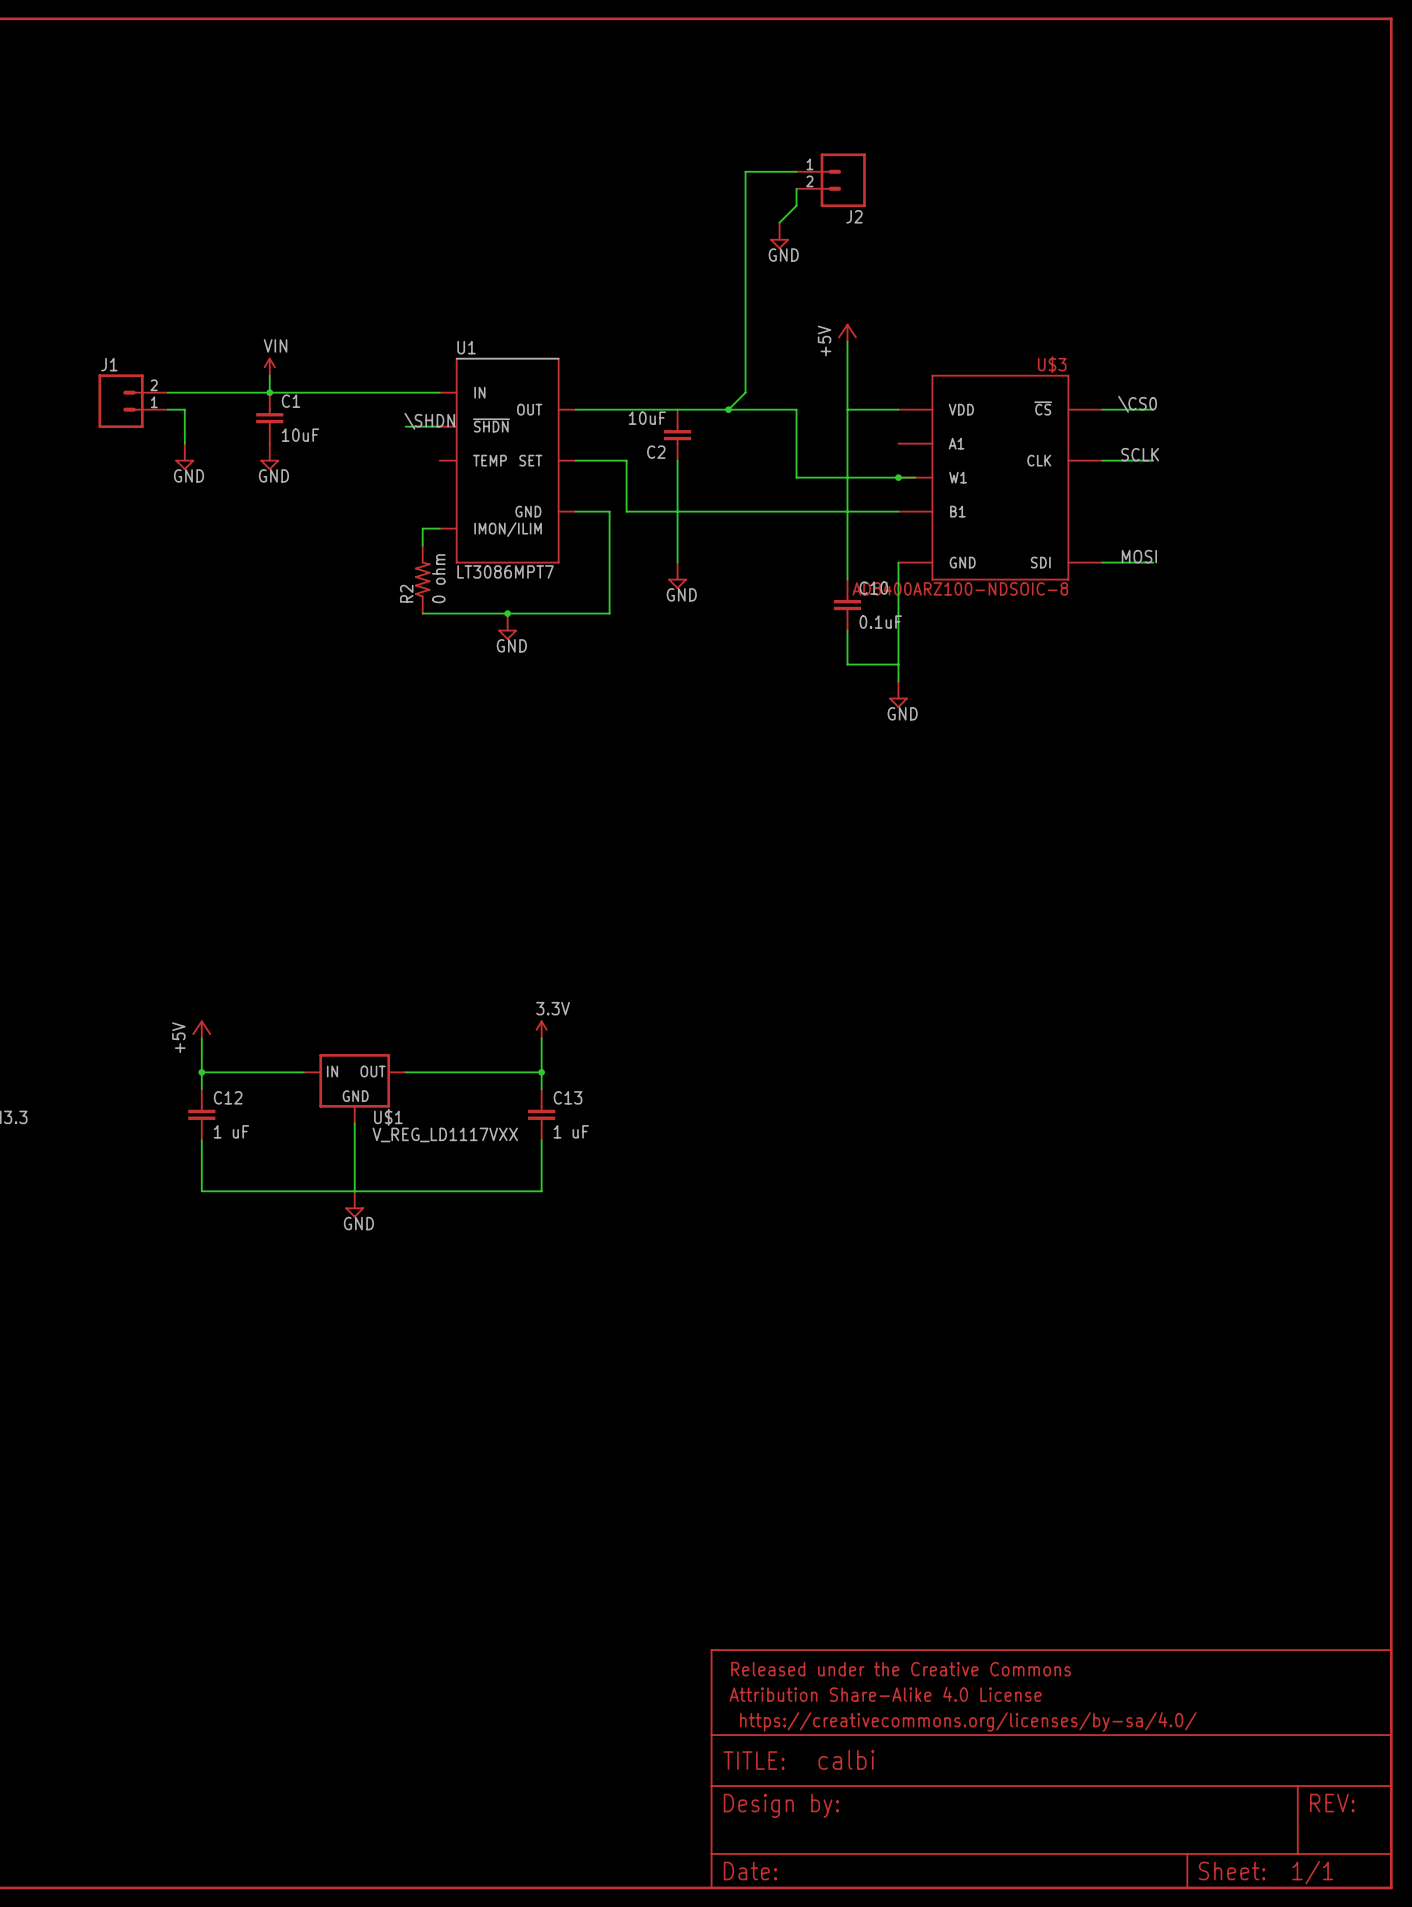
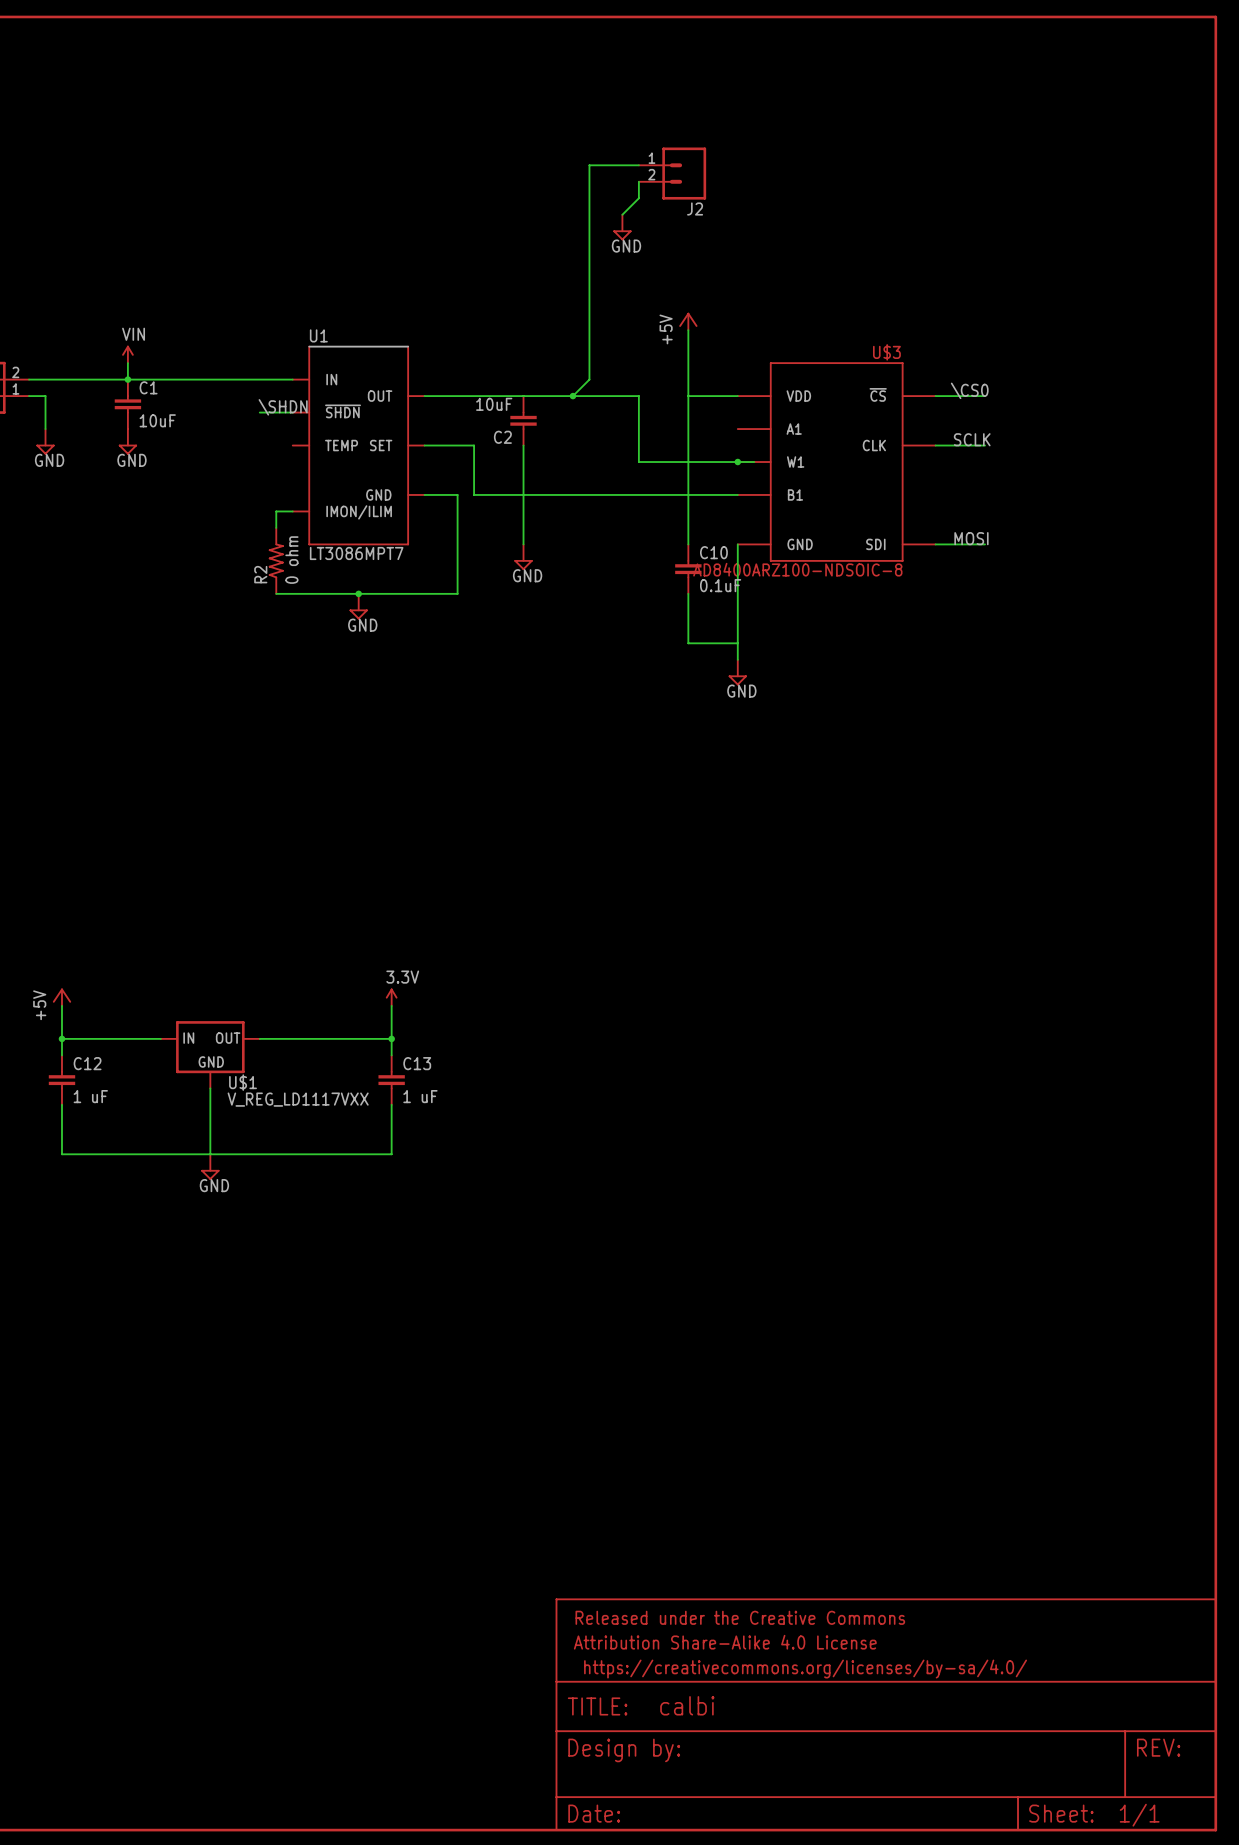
C10 position: (847, 605) -> (688, 569)

